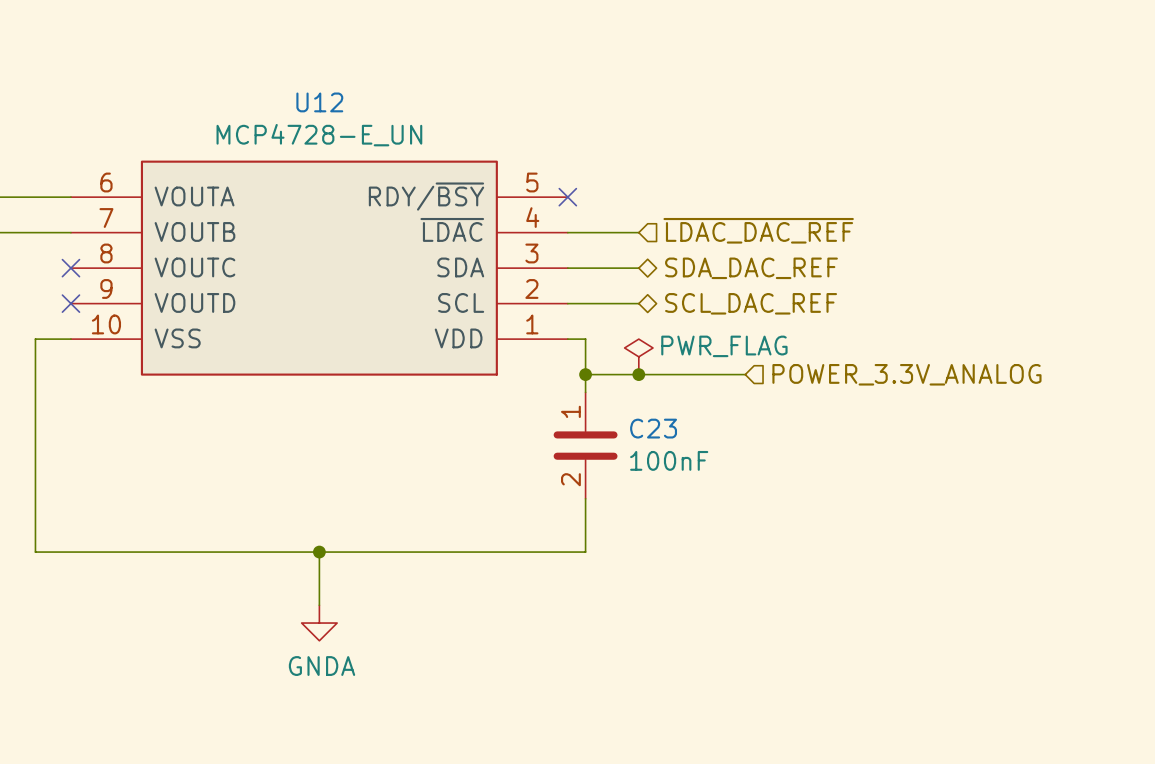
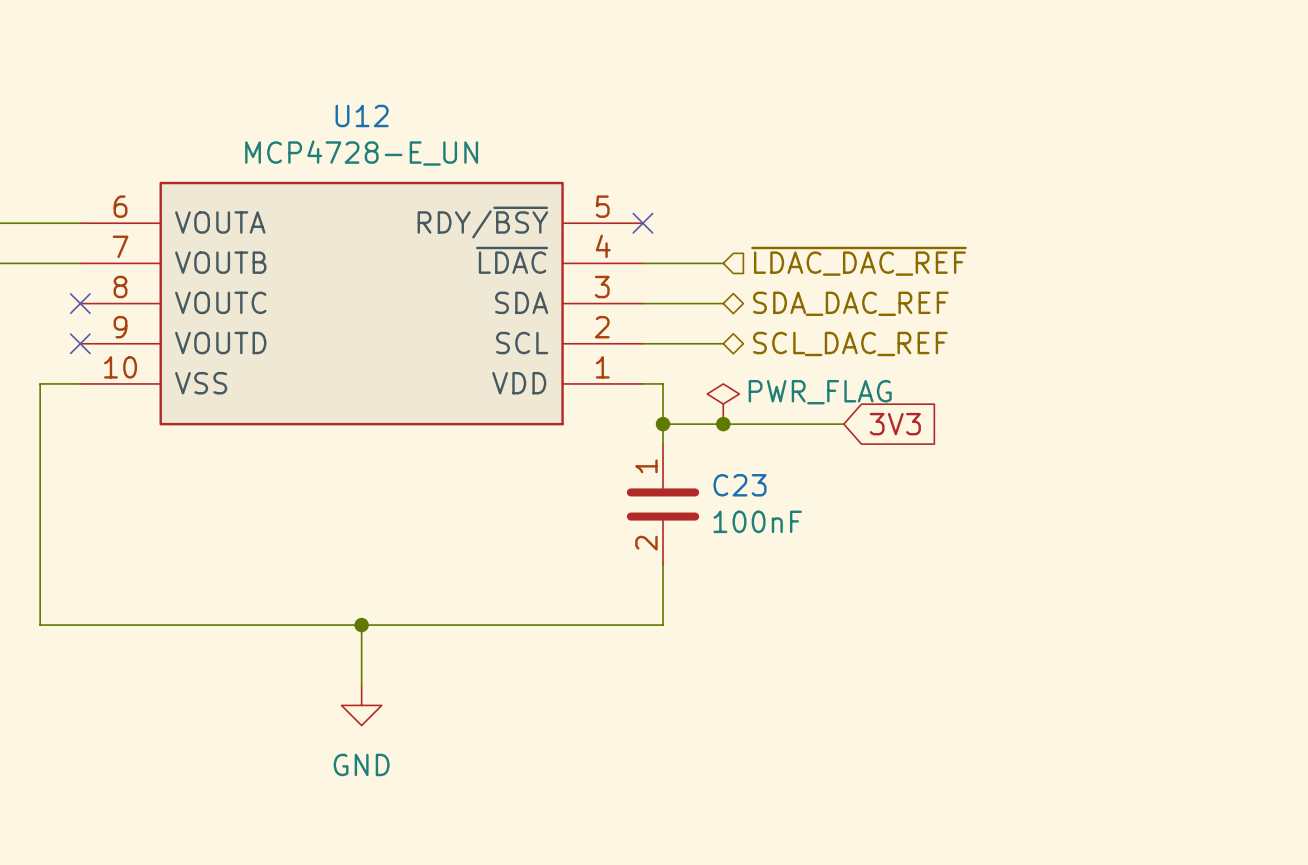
global label: none -> 3V3 (895, 424)
hierarchical label: POWER_3.3V_ANALOG (906, 374) -> none
power symbol: GNDA (319, 623) -> GND (361, 705)

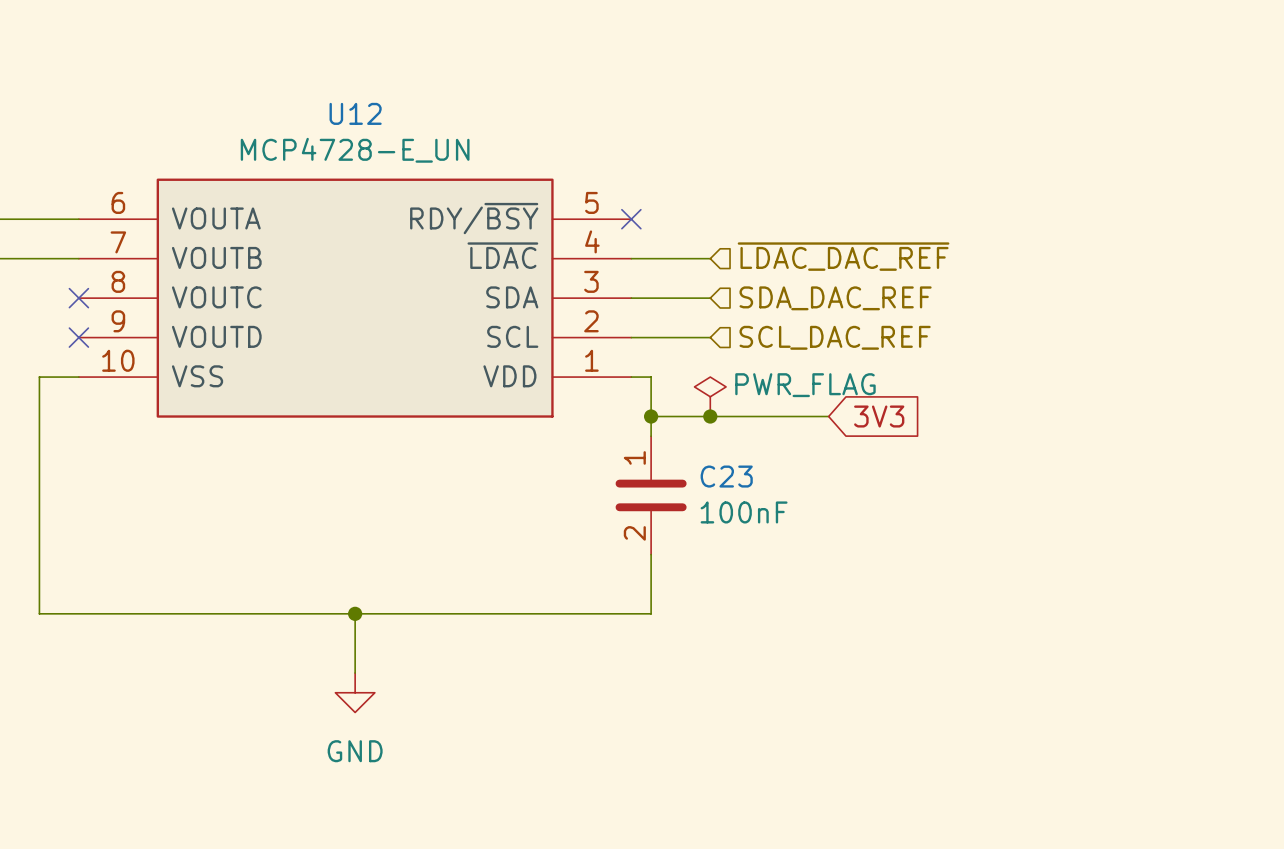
hierarchical label shape: bidirectional (850, 303) -> input (835, 298)
hierarchical label shape: bidirectional (850, 343) -> input (835, 337)

